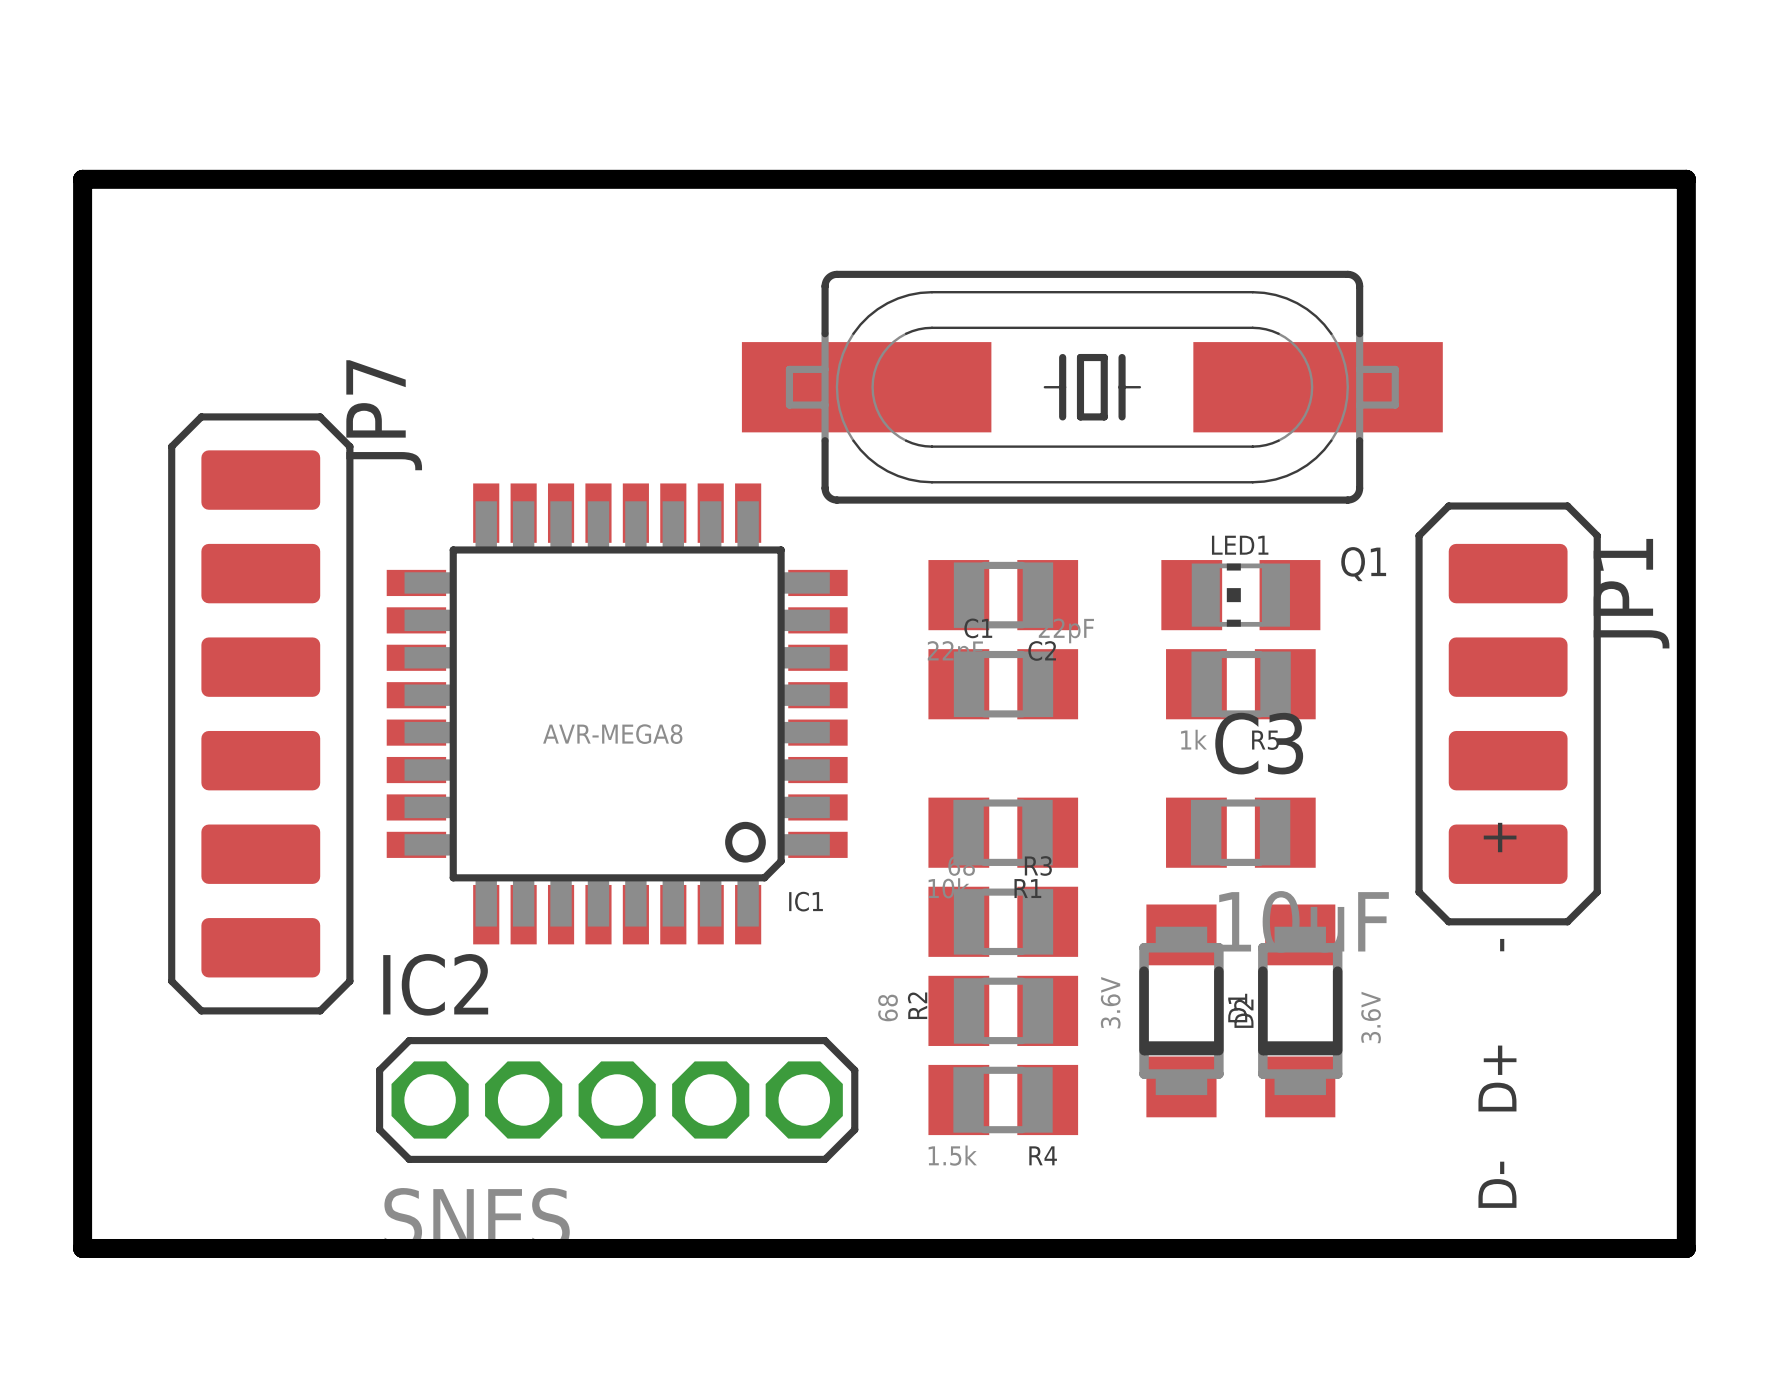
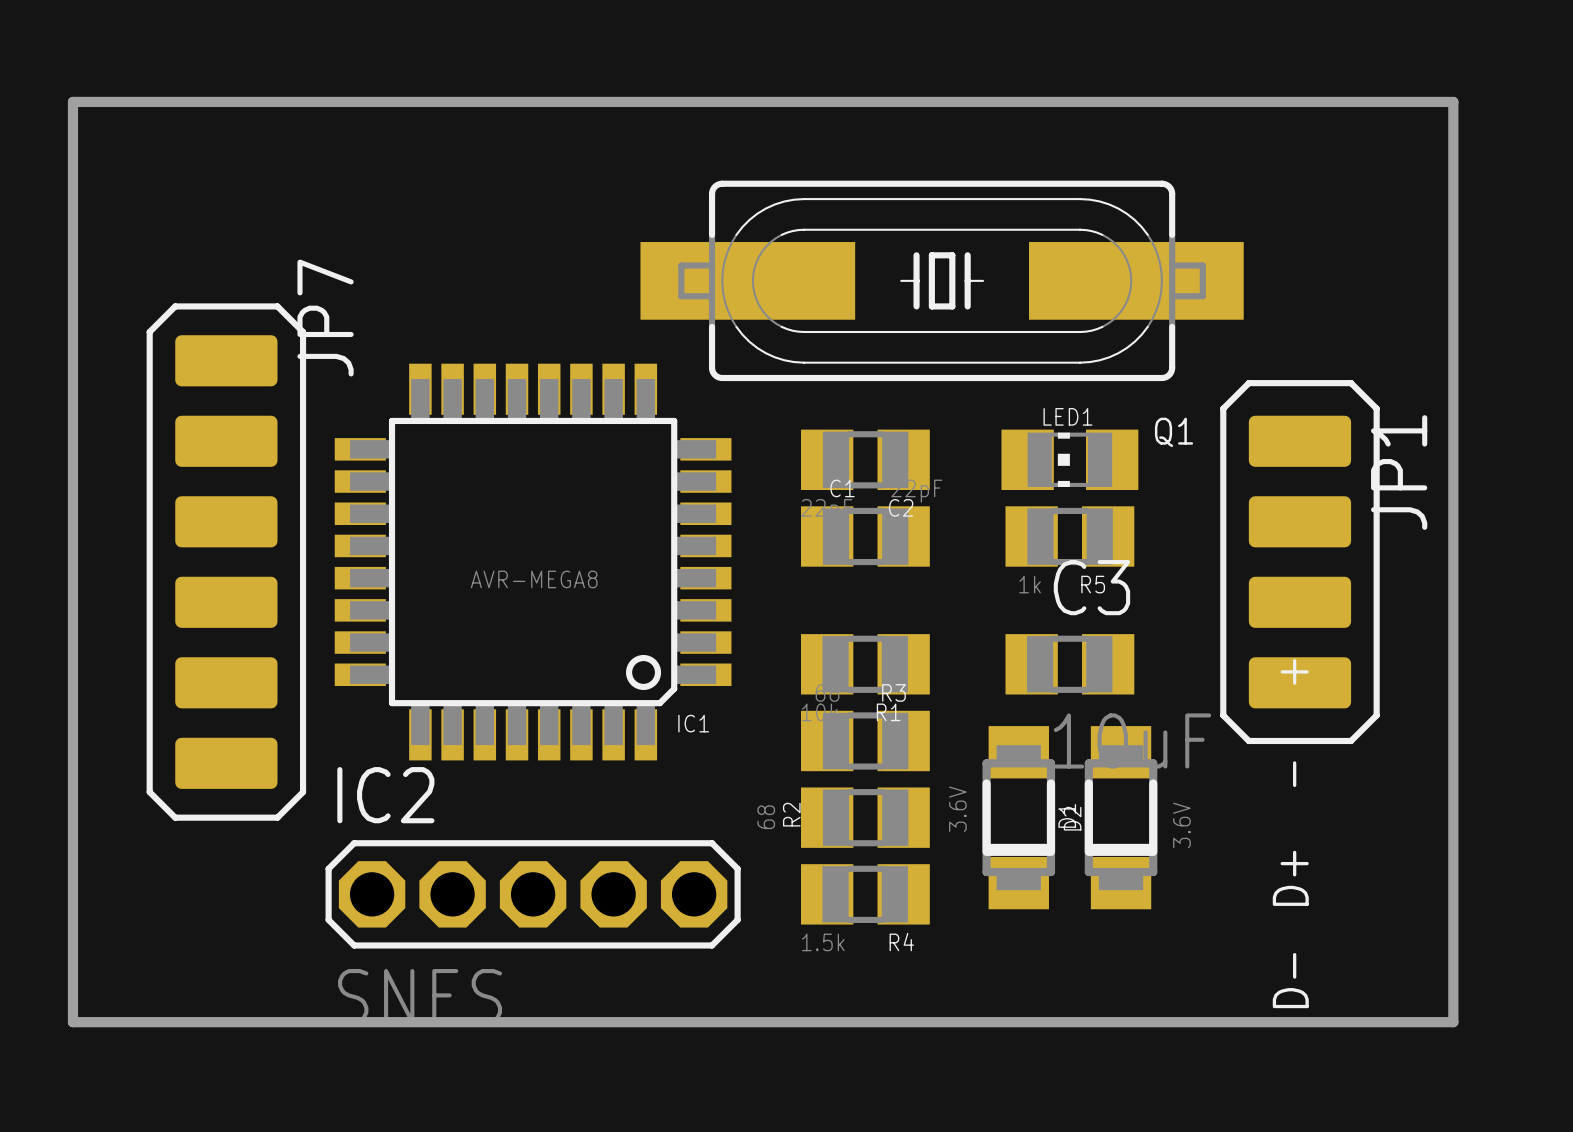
board edge width: thick (82, 179) (1686, 179) (1686, 1248) (82, 1248) (82, 179) -> thin (72, 101) (1453, 101) (1453, 1022) (72, 1022) (72, 101)

